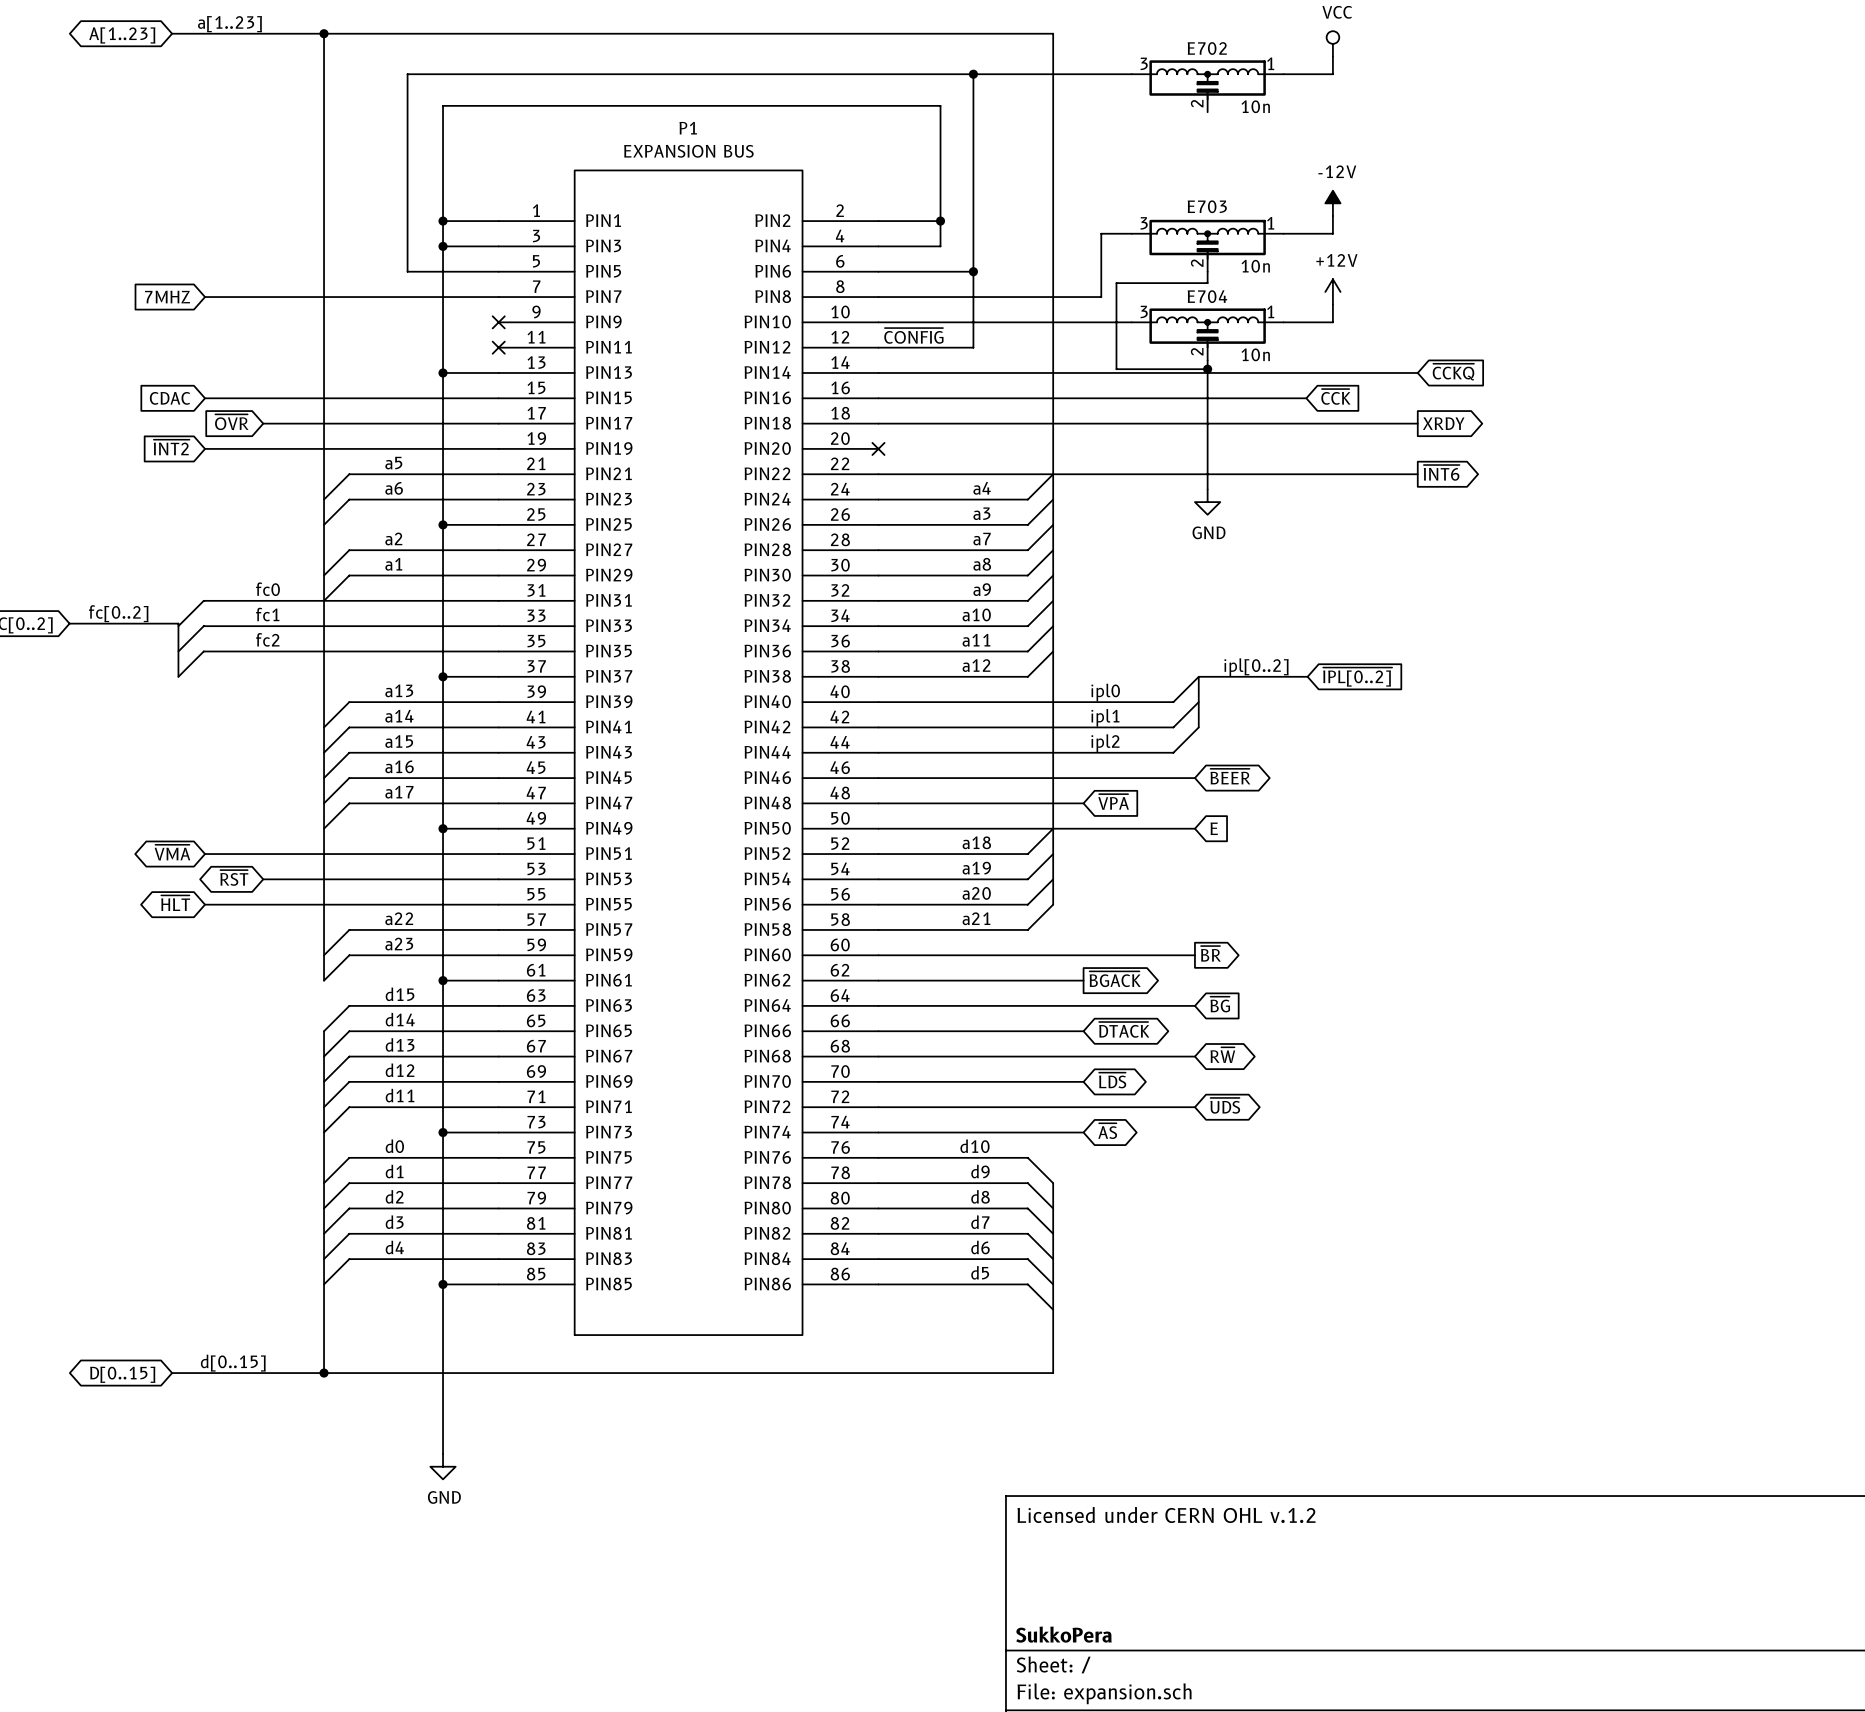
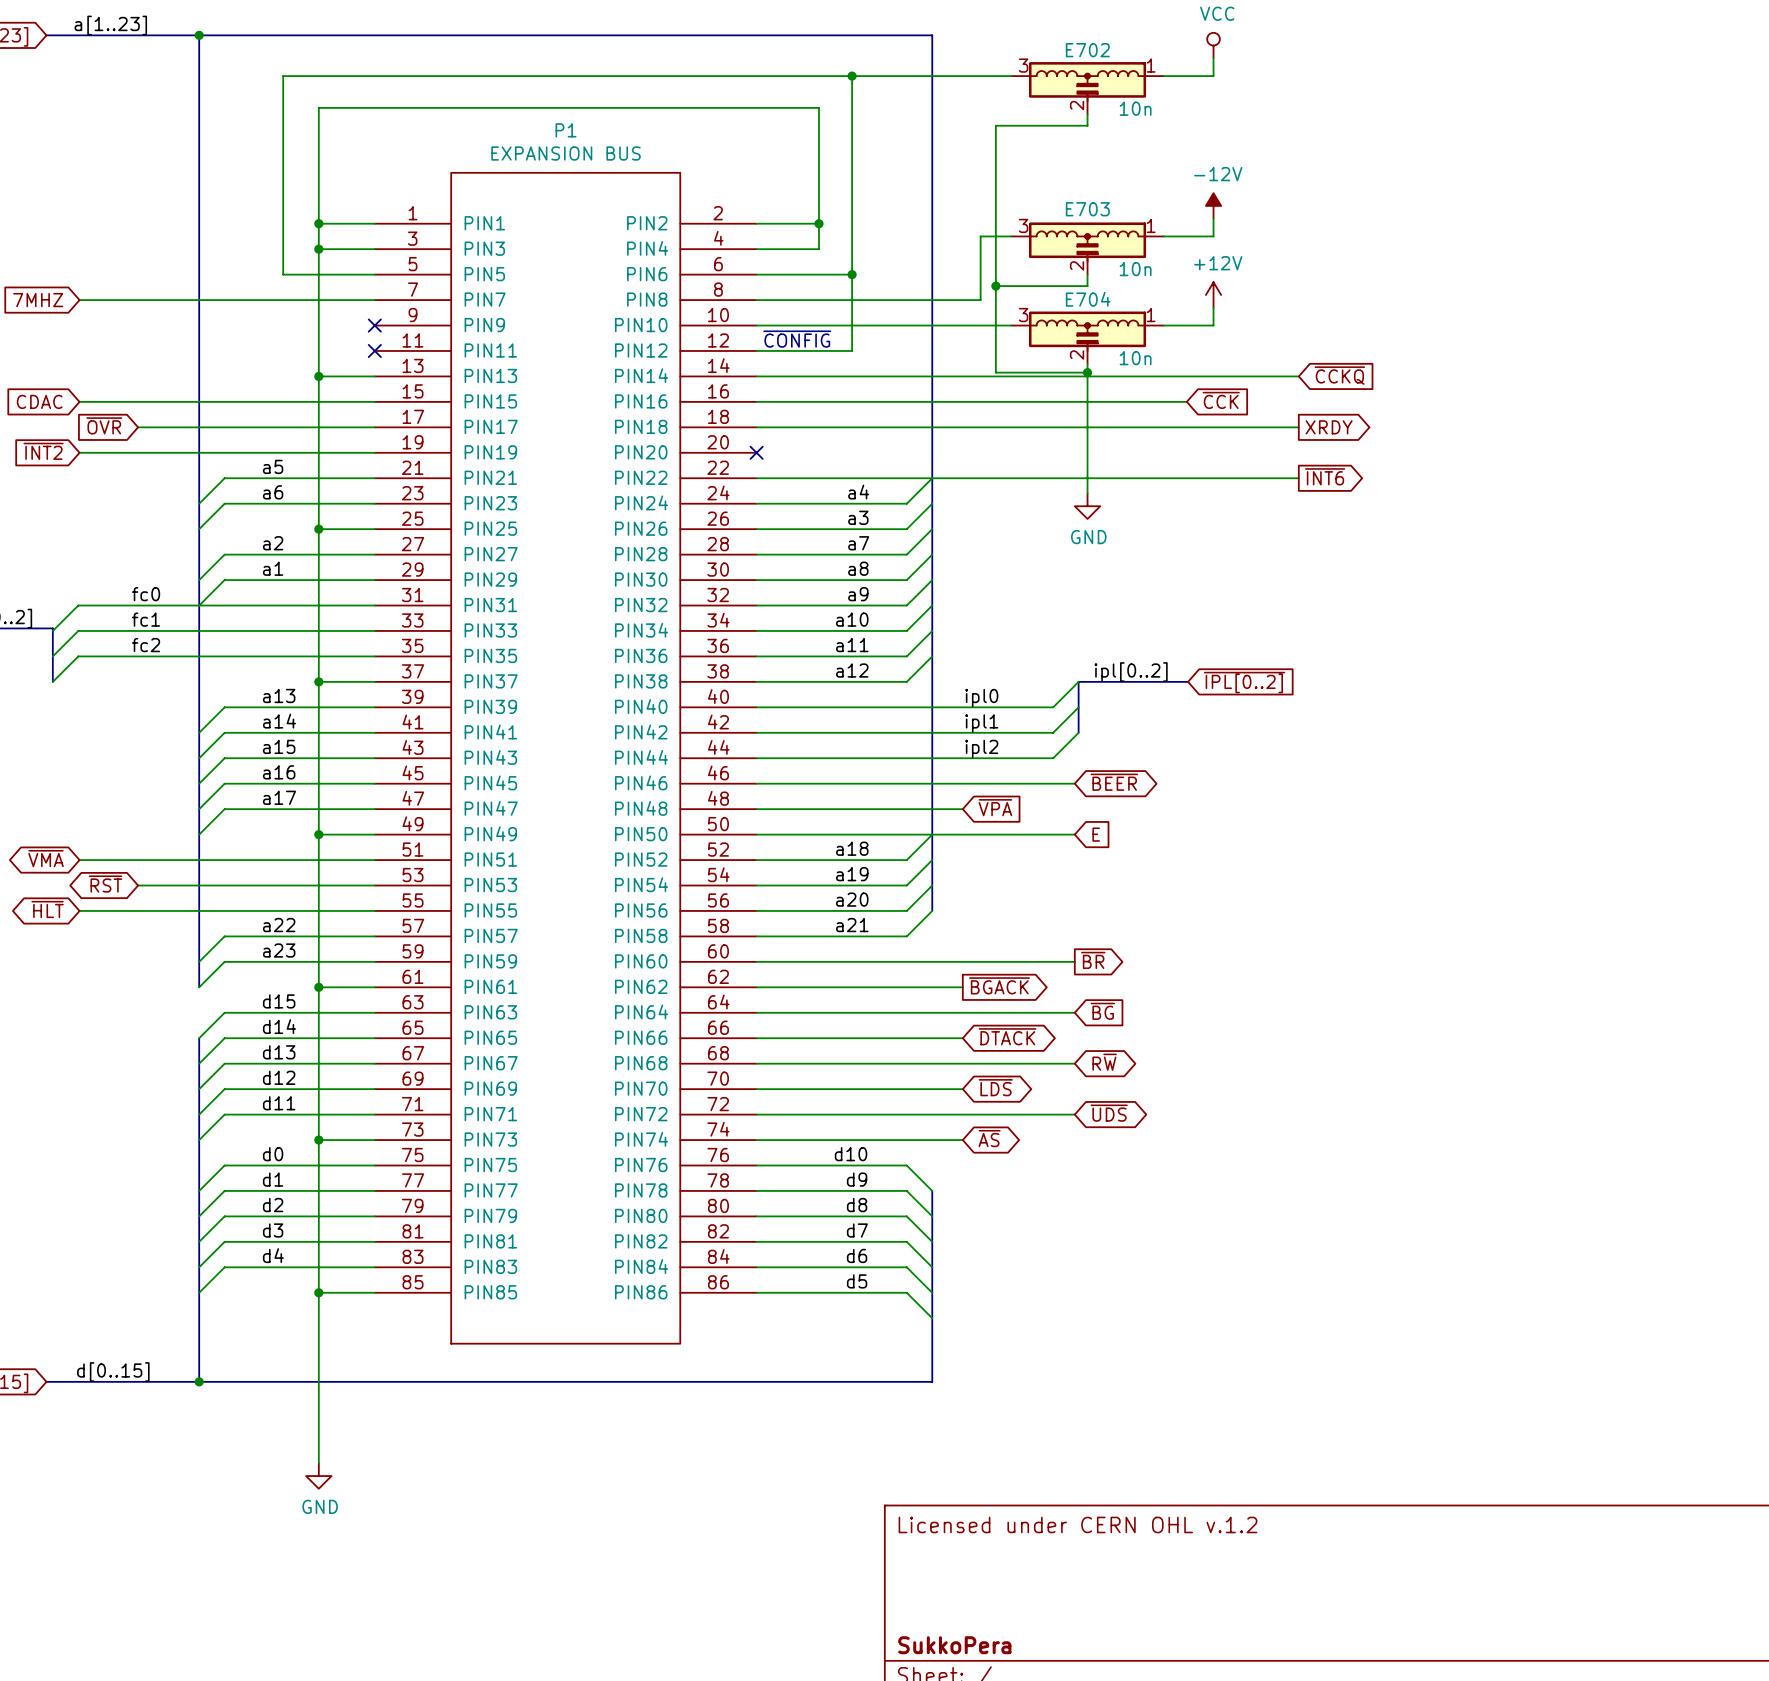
wire: none -> (1087, 114) (1087, 125) (995, 125) (995, 286)
junction: none -> (995, 286)

